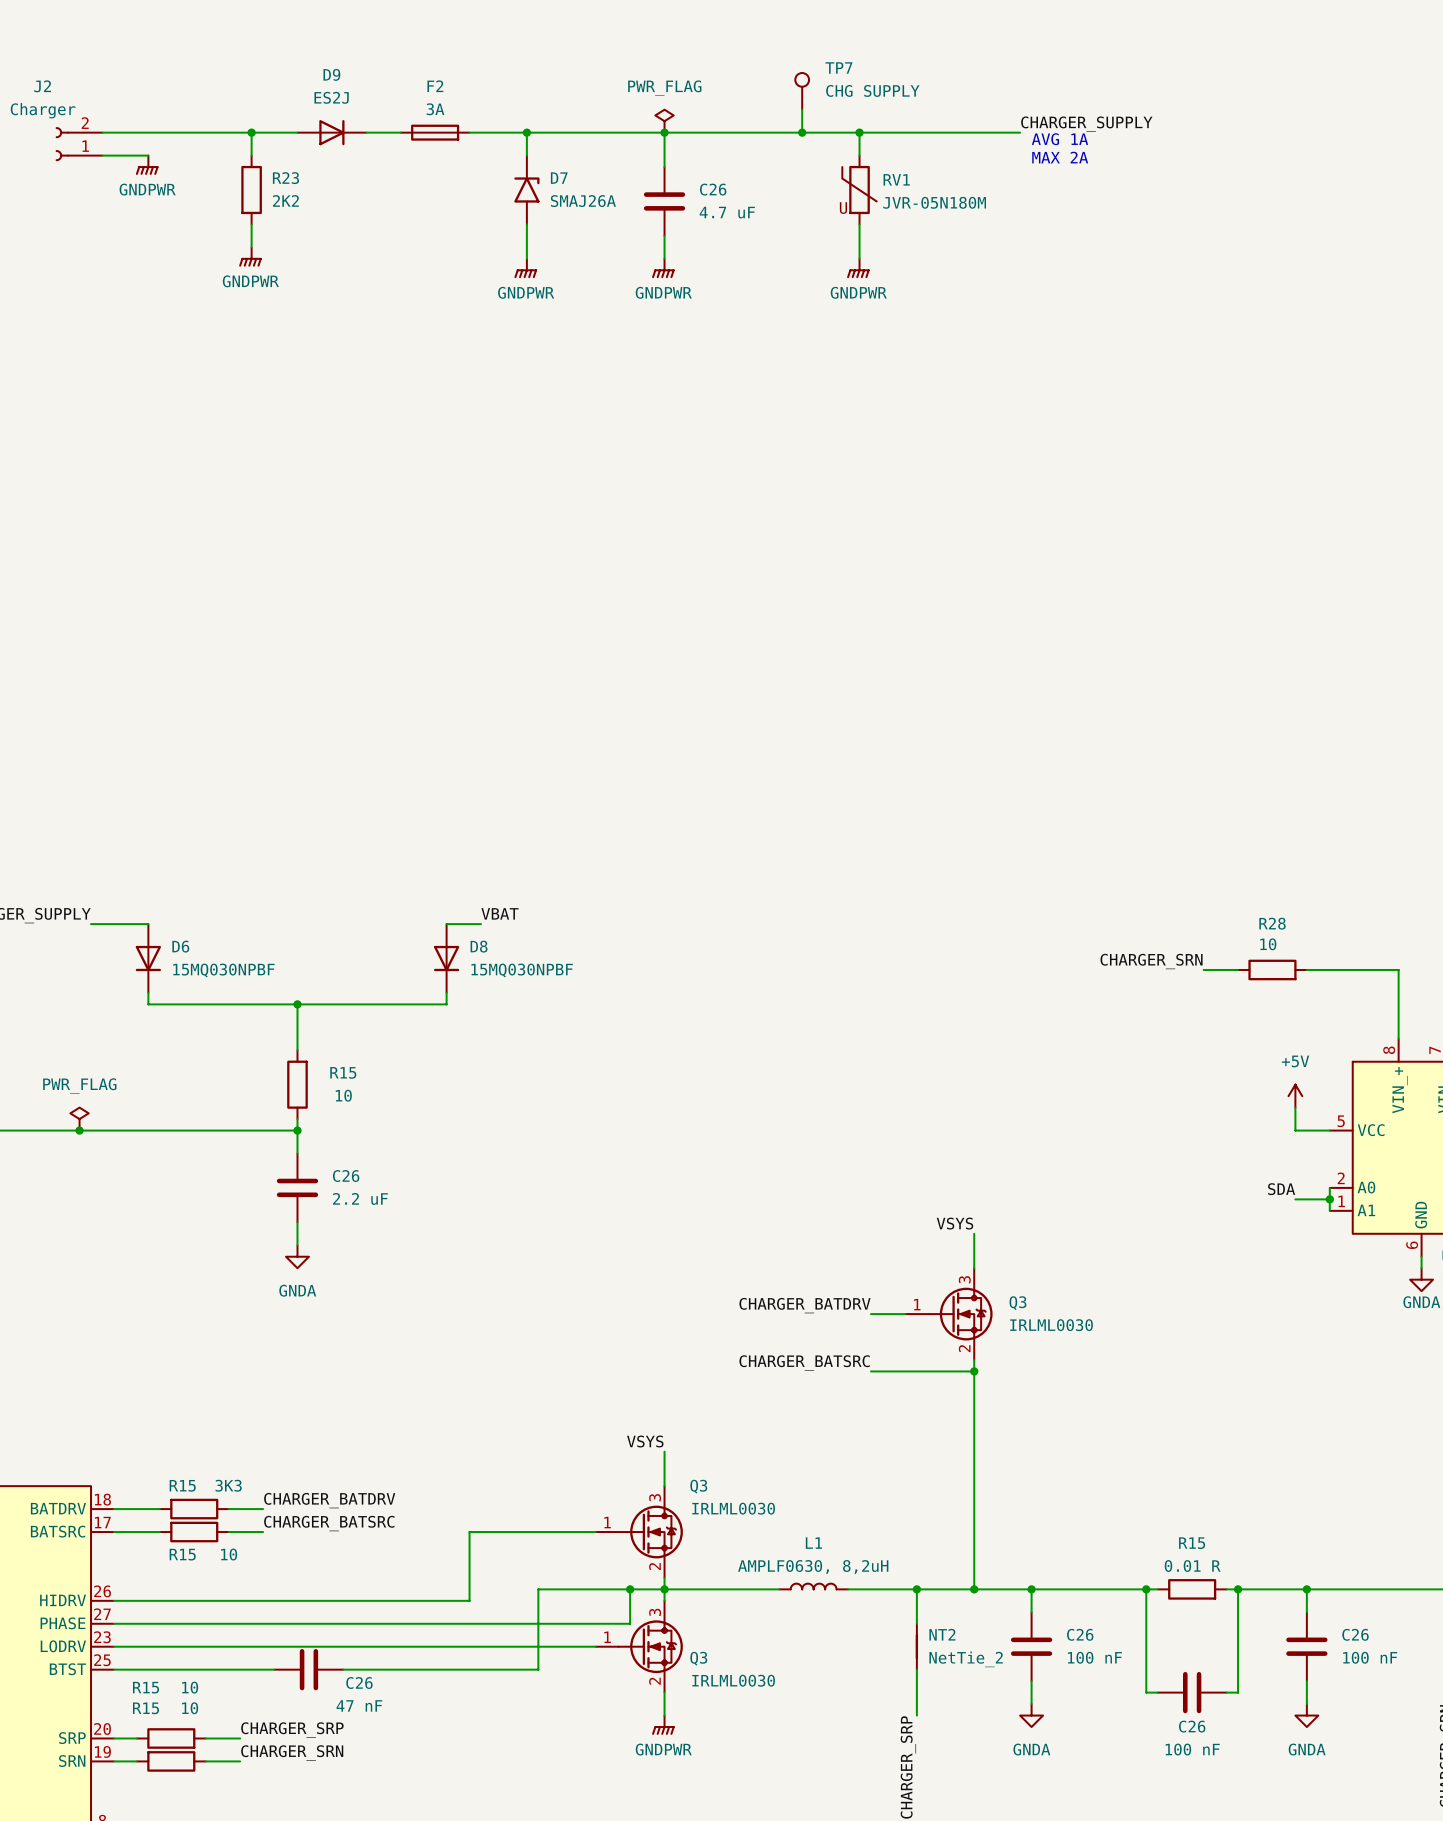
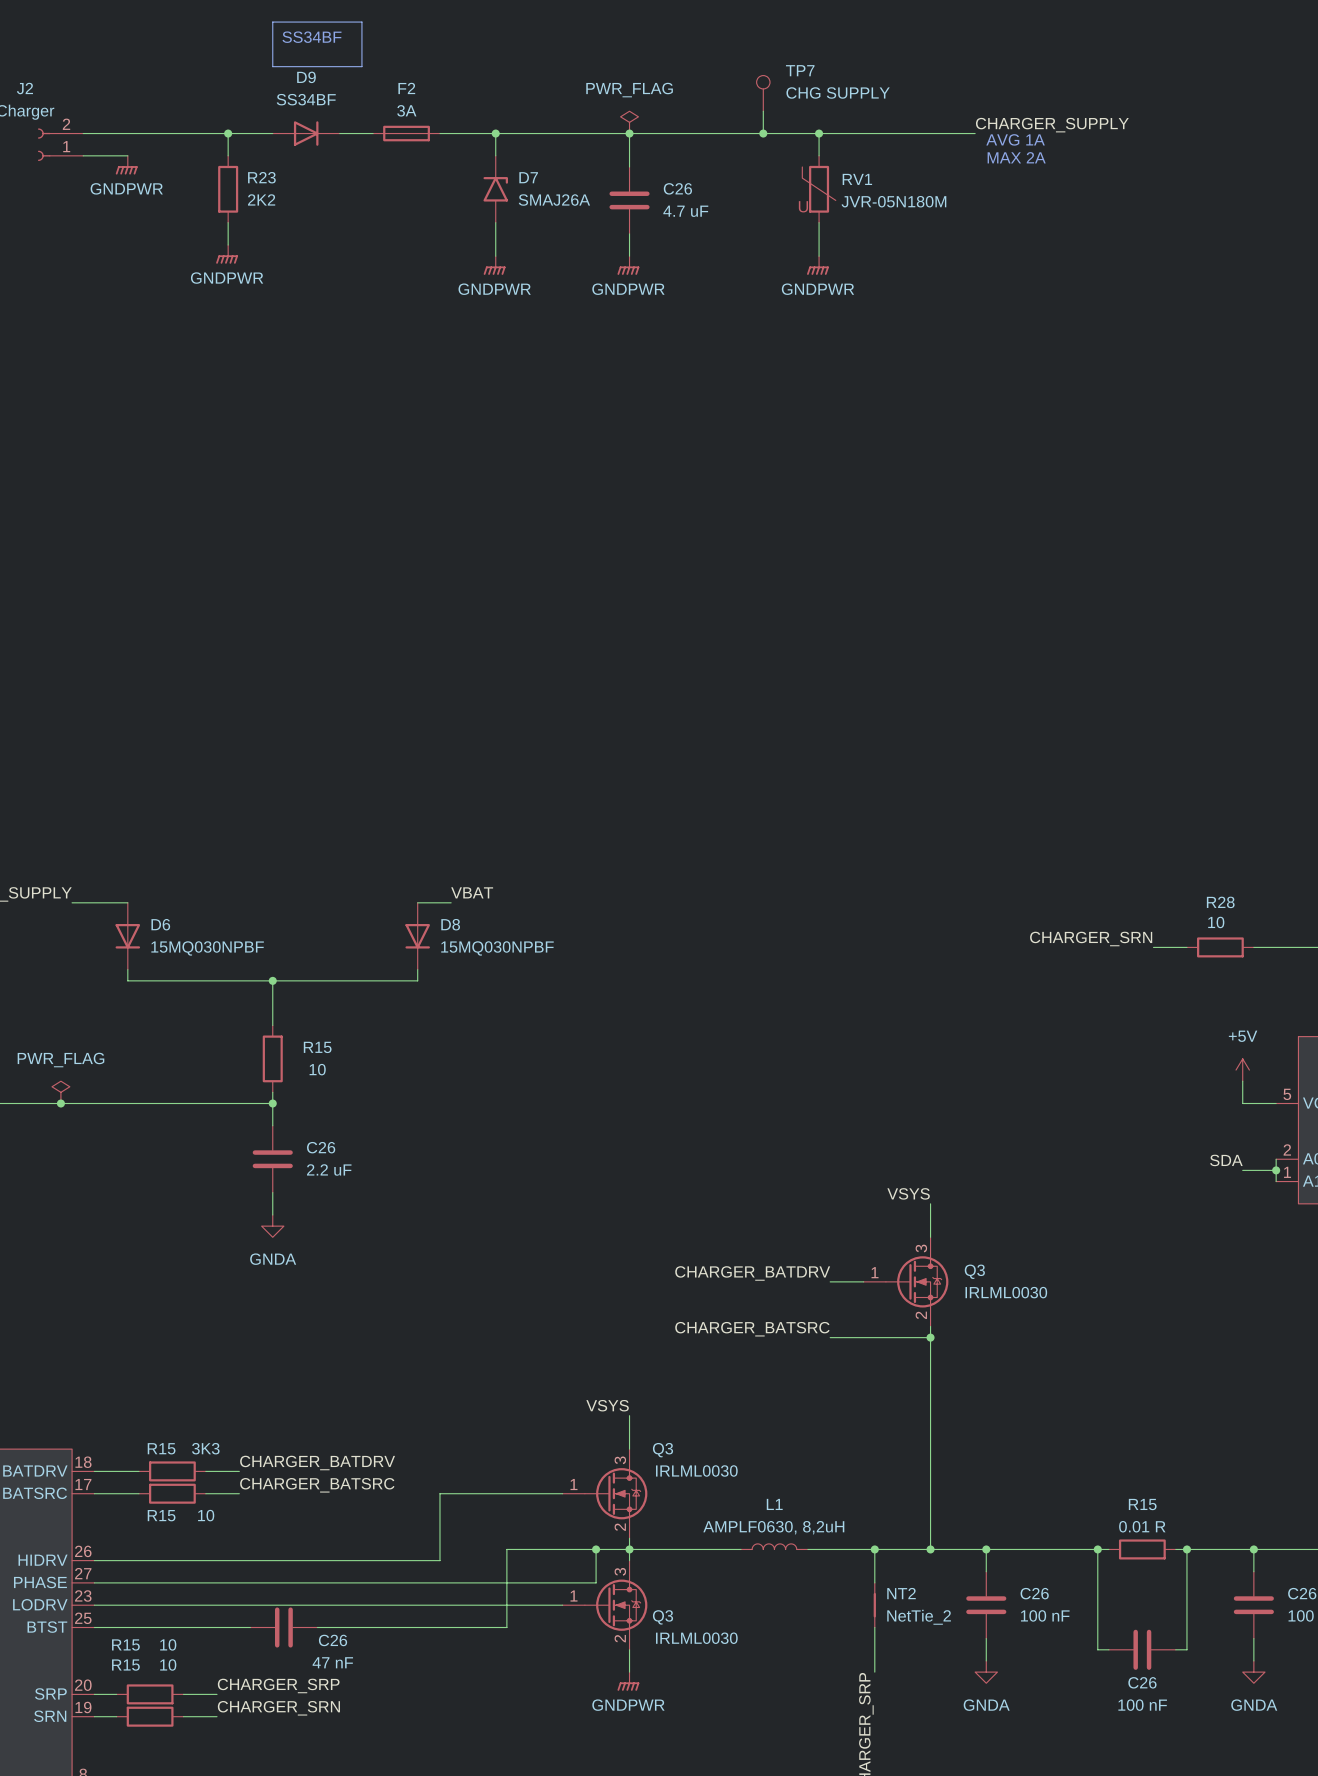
line: none -> (272, 22) (361, 22) (361, 66) (272, 66) (272, 22)
text: none -> SS34BF (312, 37)
D9 value: ES2J (331, 97) -> SS34BF (306, 99)

